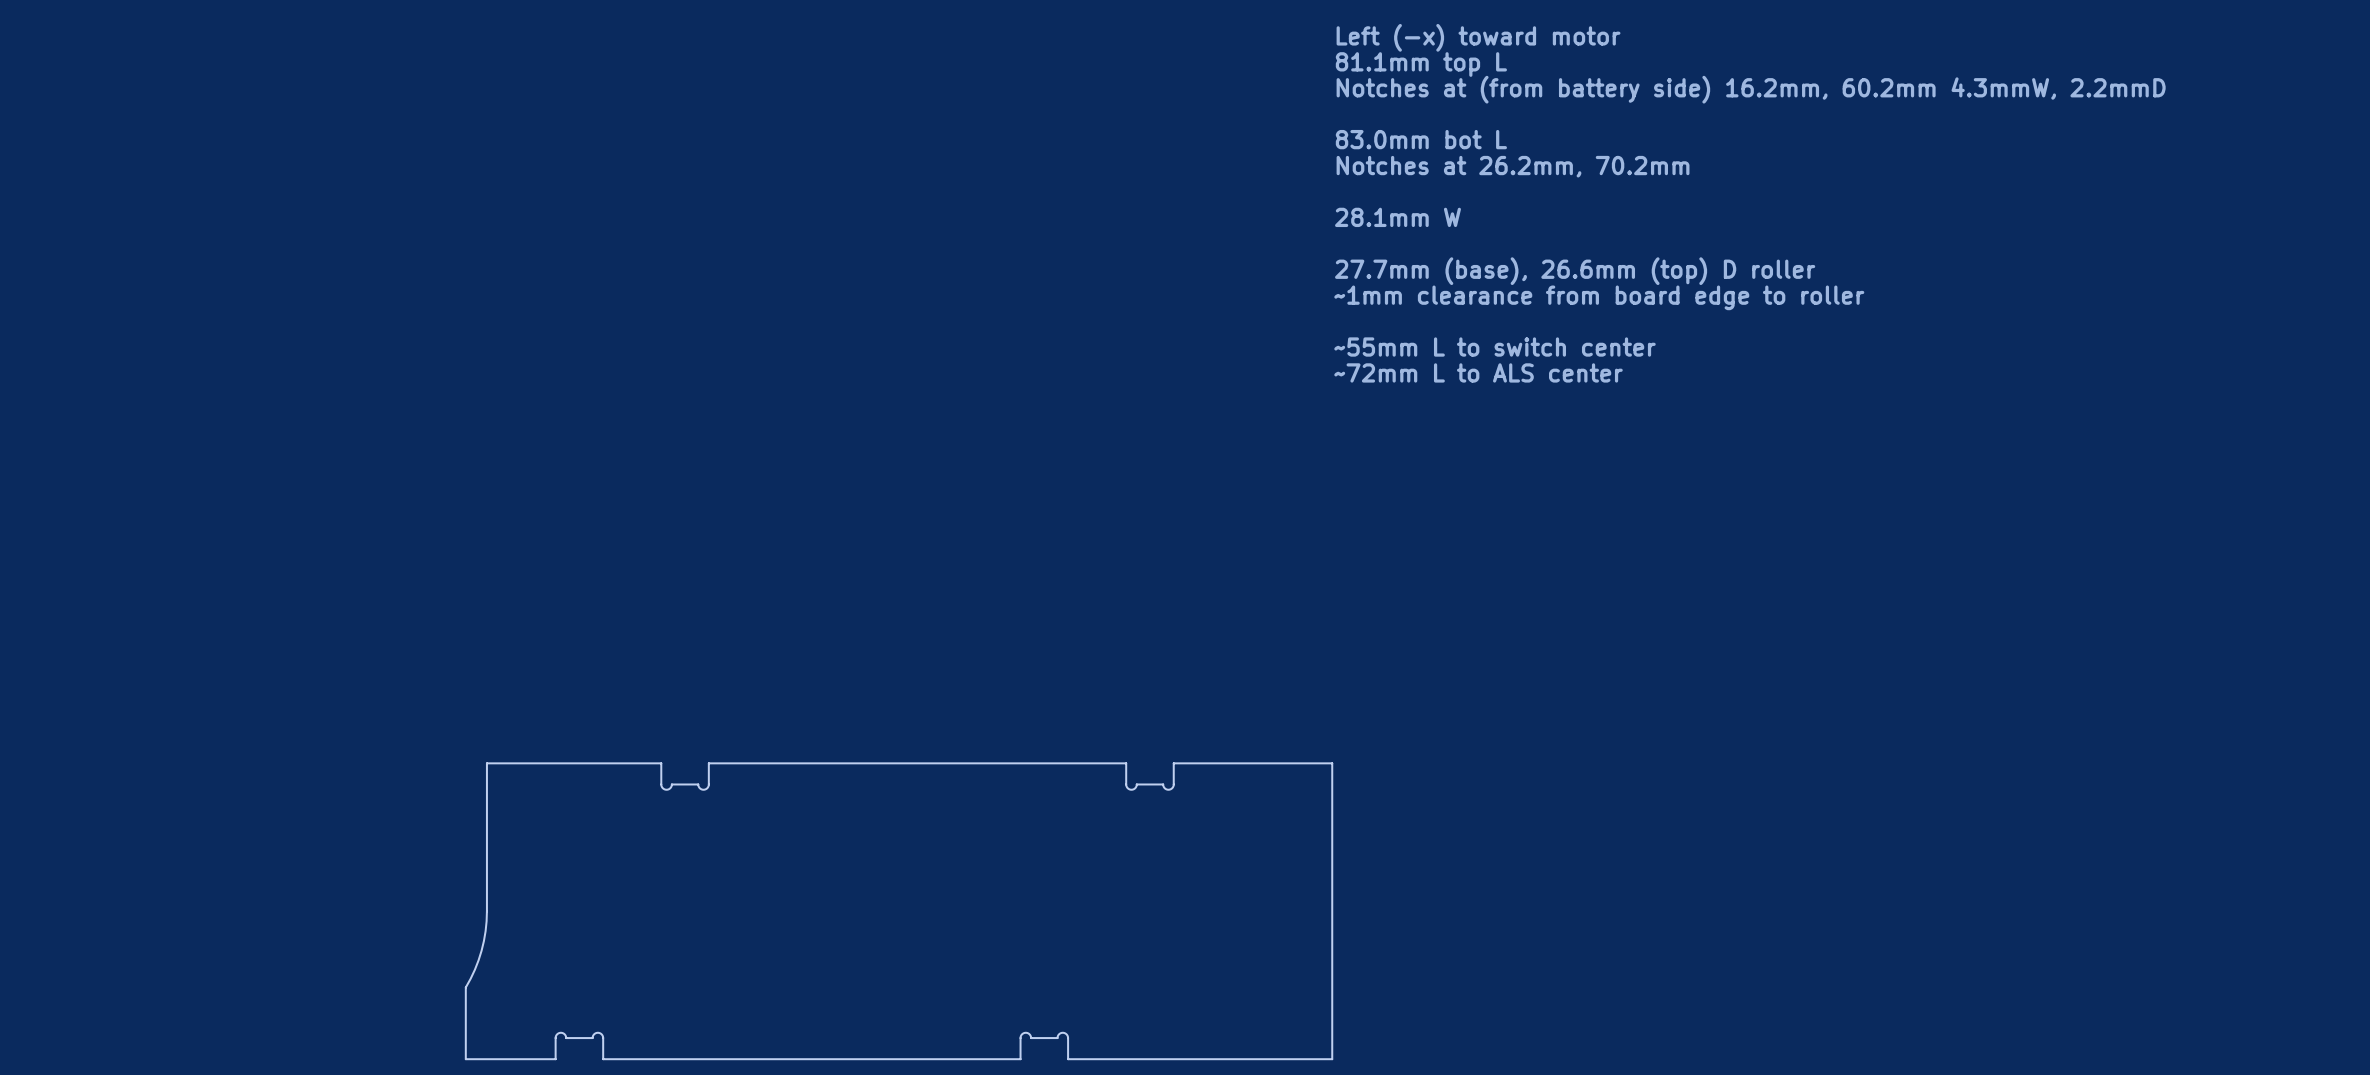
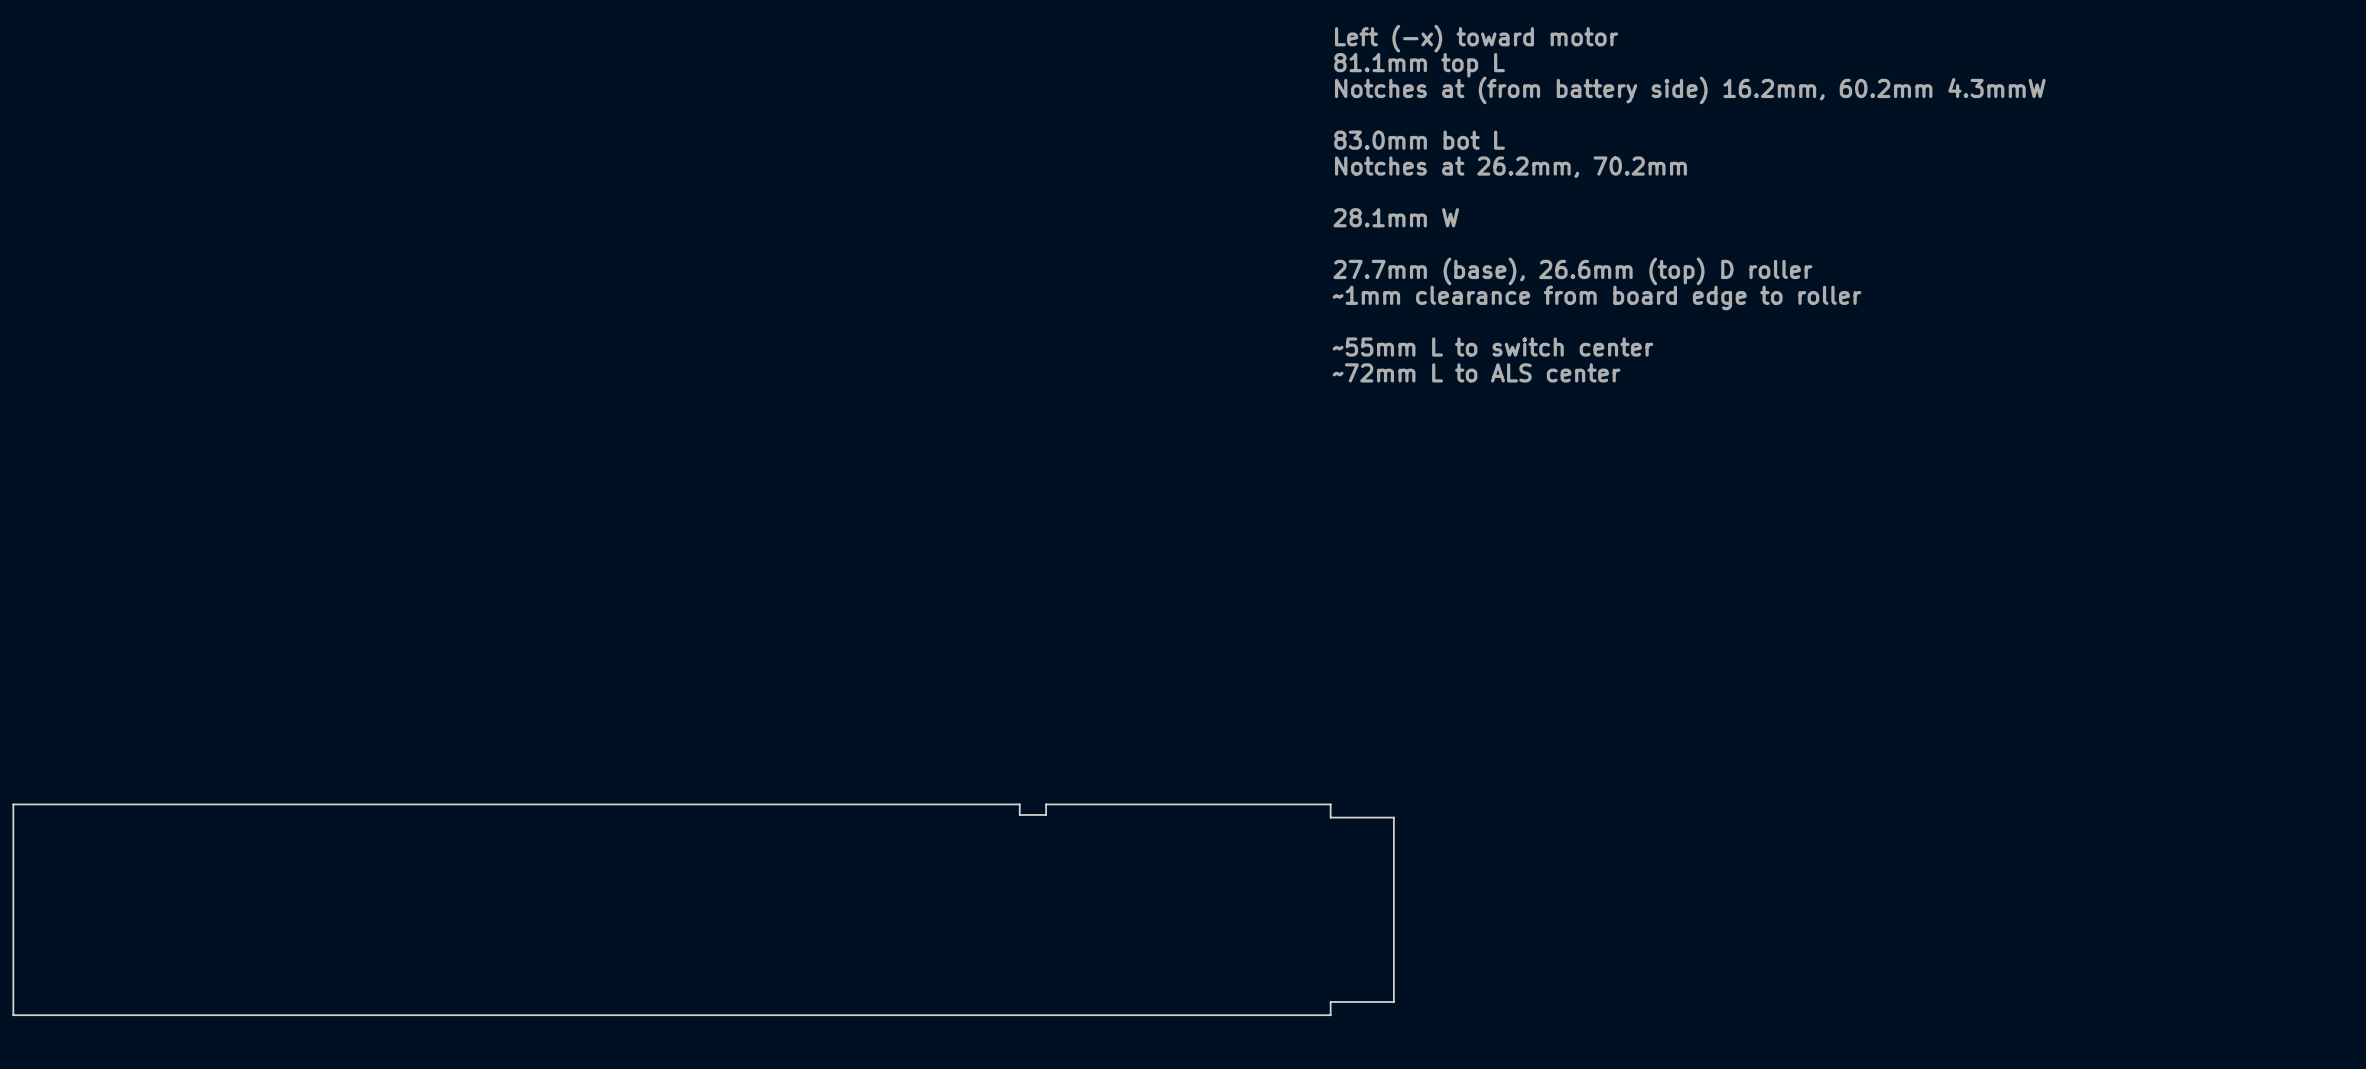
text: Notches at (from battery side) 16.2mm, 60.2mm 4.3mmW, 2.2mmD (1751, 89) -> Notches at (from battery side) 16.2mm, 60.2mm 4.3mmW (1690, 90)
board edge: (1332, 805) (1332, 763) (1173, 763) (1173, 785) (1168, 789) (1164, 788) (1163, 784) (1136, 784) (1134, 789) (1128, 789) (1126, 785) (1126, 763) (708, 763) (708, 785) (703, 789) (699, 788) (698, 784) (671, 784) (669, 789) (663, 789) (661, 785) (661, 763) (486, 763) (486, 921) (478, 960) (465, 987) (465, 1059) (555, 1059) (555, 1036) (560, 1032) (564, 1034) (566, 1038) (592, 1038) (595, 1033) (600, 1033) (603, 1037) (603, 1059) (1020, 1059) (1020, 1036) (1025, 1032) (1029, 1034) (1031, 1038) (1057, 1038) (1060, 1033) (1065, 1033) (1068, 1037) (1068, 1059) (1332, 1059) (1332, 1016) -> (1330, 804) (1046, 804) (1046, 814) (1019, 814) (1019, 804) (13, 804) (13, 1015) (1330, 1015)
board edge: (1332, 818) (1332, 1003) -> (1330, 817) (1393, 817) (1393, 1002) (1330, 1002)

